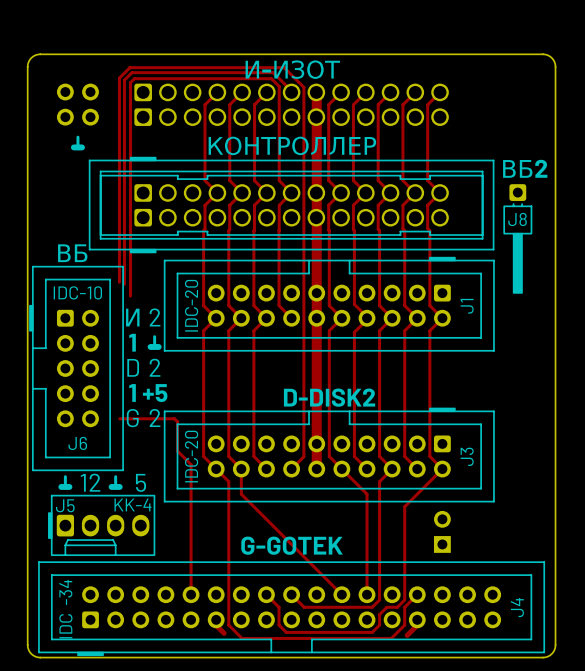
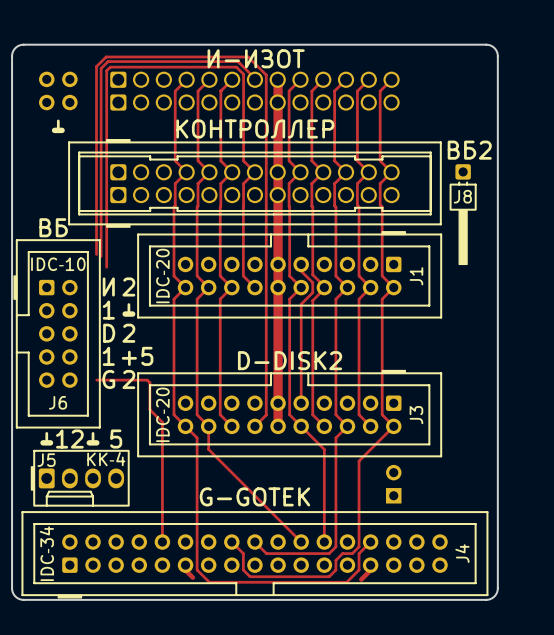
track: none -> (301, 271) (312, 282) (312, 292) (301, 304) (301, 403)

